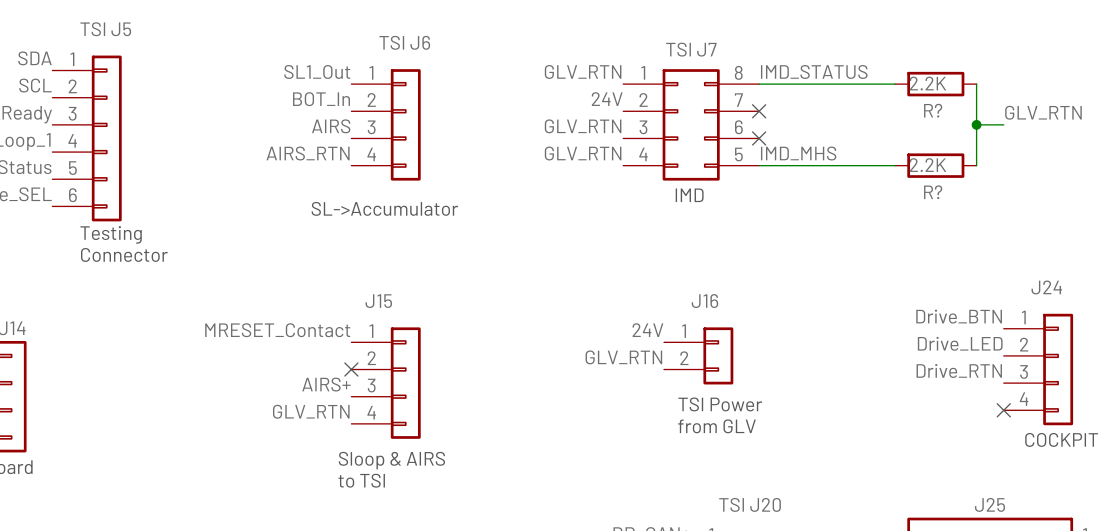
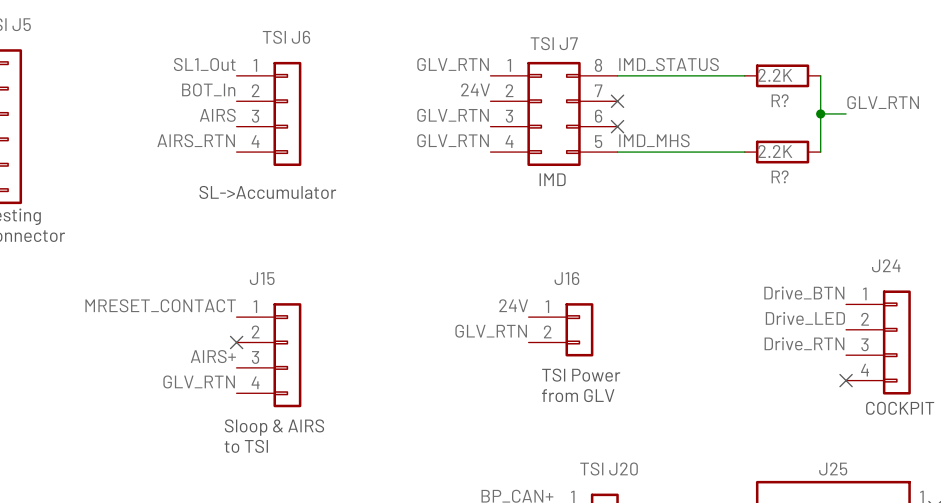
label: MRESET_Contact (277, 330) -> MRESET_CONTACT (160, 305)

